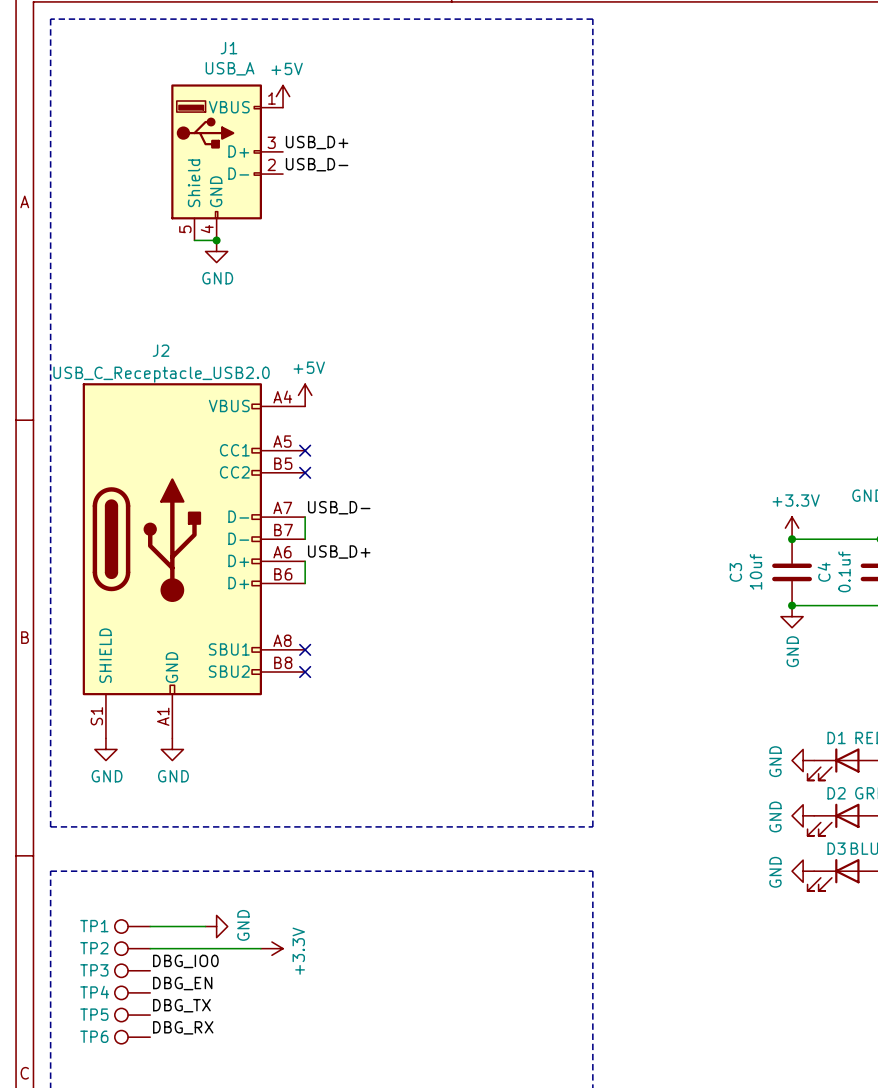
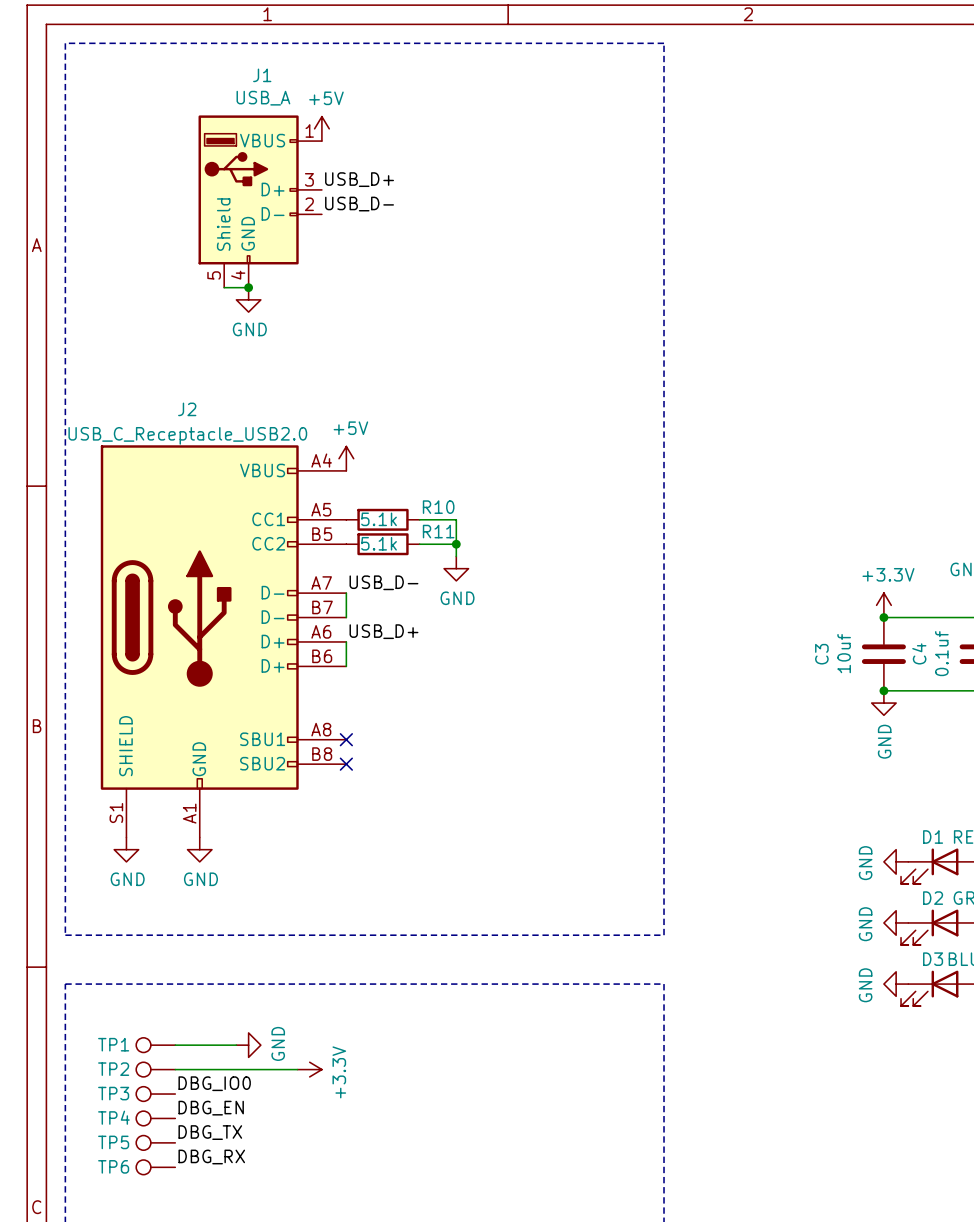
no-connect mark: (305, 450) -> none
R10: none -> 5.1k (383, 519)
wire: none -> (419, 519) (456, 519) (456, 556)
no-connect mark: (305, 472) -> none
R11: none -> 5.1k (383, 544)
wire: none -> (419, 544) (456, 544)
junction: none -> (456, 544)
power symbol: none -> GND (456, 568)

